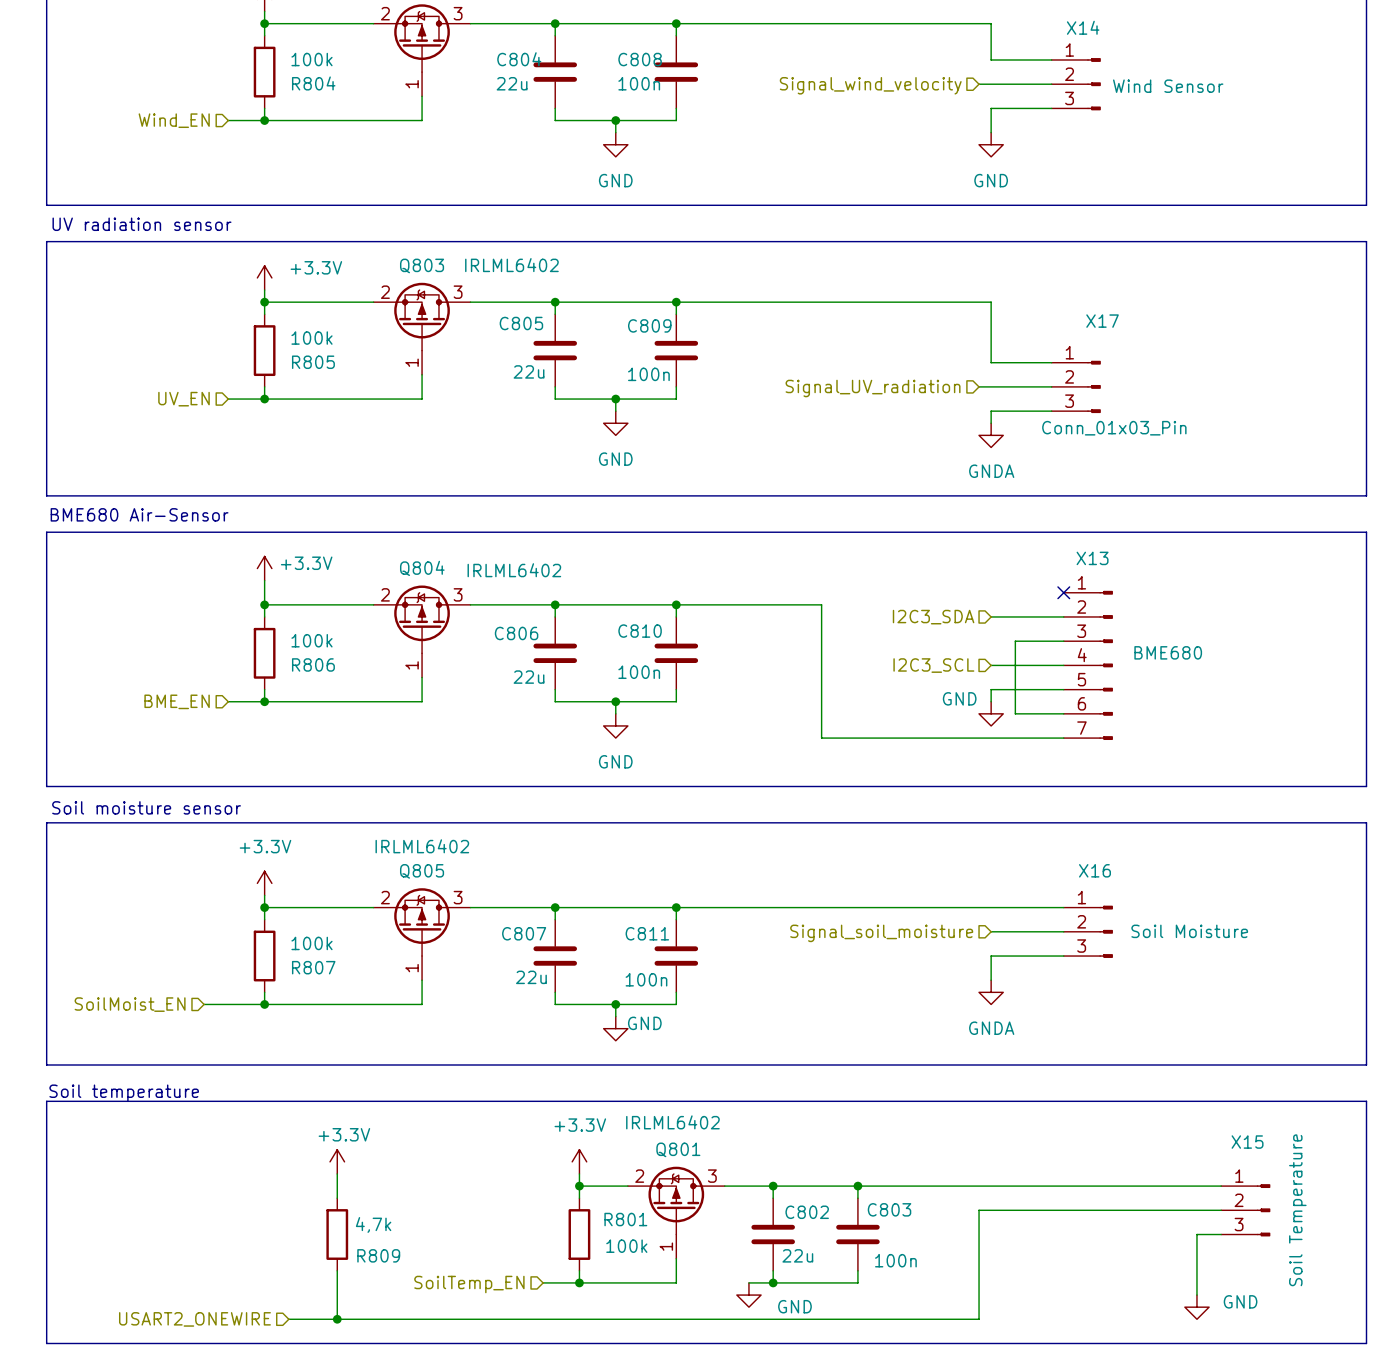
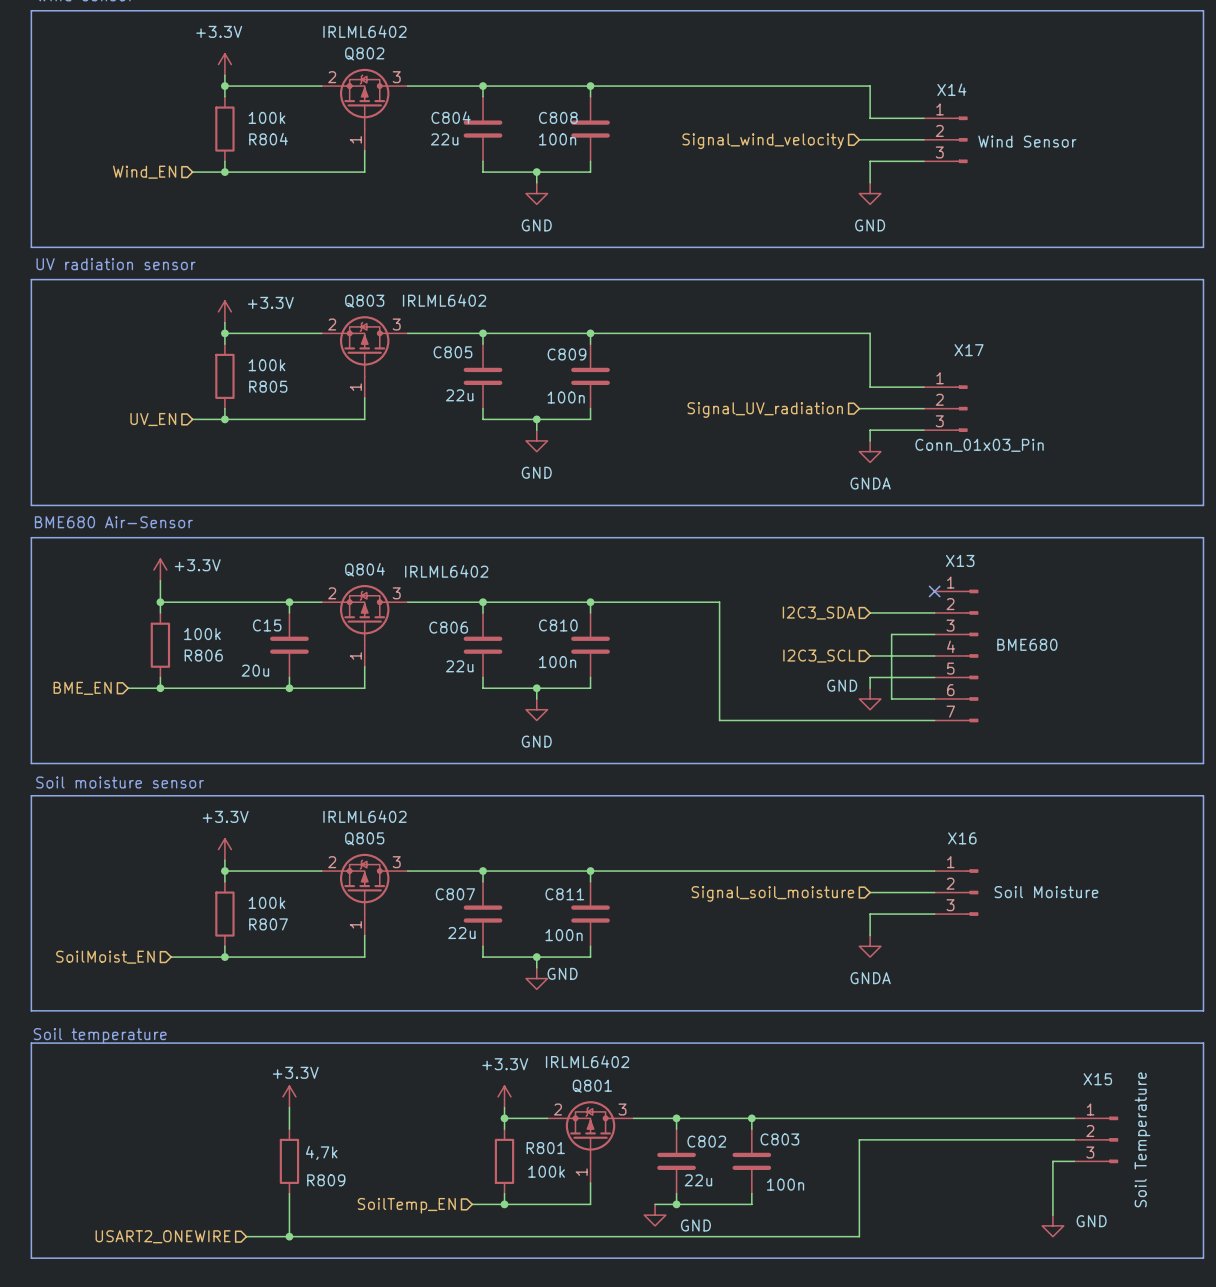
power symbol position: +3.3V (264, 568) -> +3.3V (160, 569)
wire: (264, 580) (264, 616) -> (160, 580) (160, 612)
wire: none -> (160, 602) (224, 602)
junction: none -> (160, 602)
junction: (264, 604) -> none
wire: none -> (289, 602) (289, 612)
junction: none -> (289, 602)
R806 position: (264, 653) -> (160, 645)
C15: none -> 20u (289, 645)
wire: (264, 689) (264, 701) -> (160, 677) (160, 688)
wire: none -> (289, 677) (289, 688)
wire: none -> (128, 688) (192, 688)
hierarchical label position: BME_EN (177, 701) -> BME_EN (82, 688)
junction: none -> (160, 688)
junction: (264, 701) -> none
junction: none -> (289, 688)

